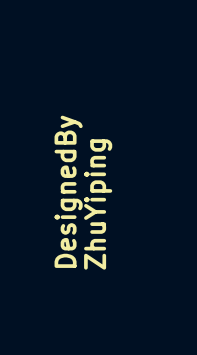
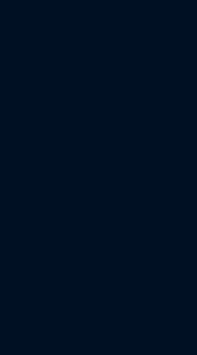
text: DesignedBy (68, 191) -> none
text: ZhuYiping (98, 204) -> none

